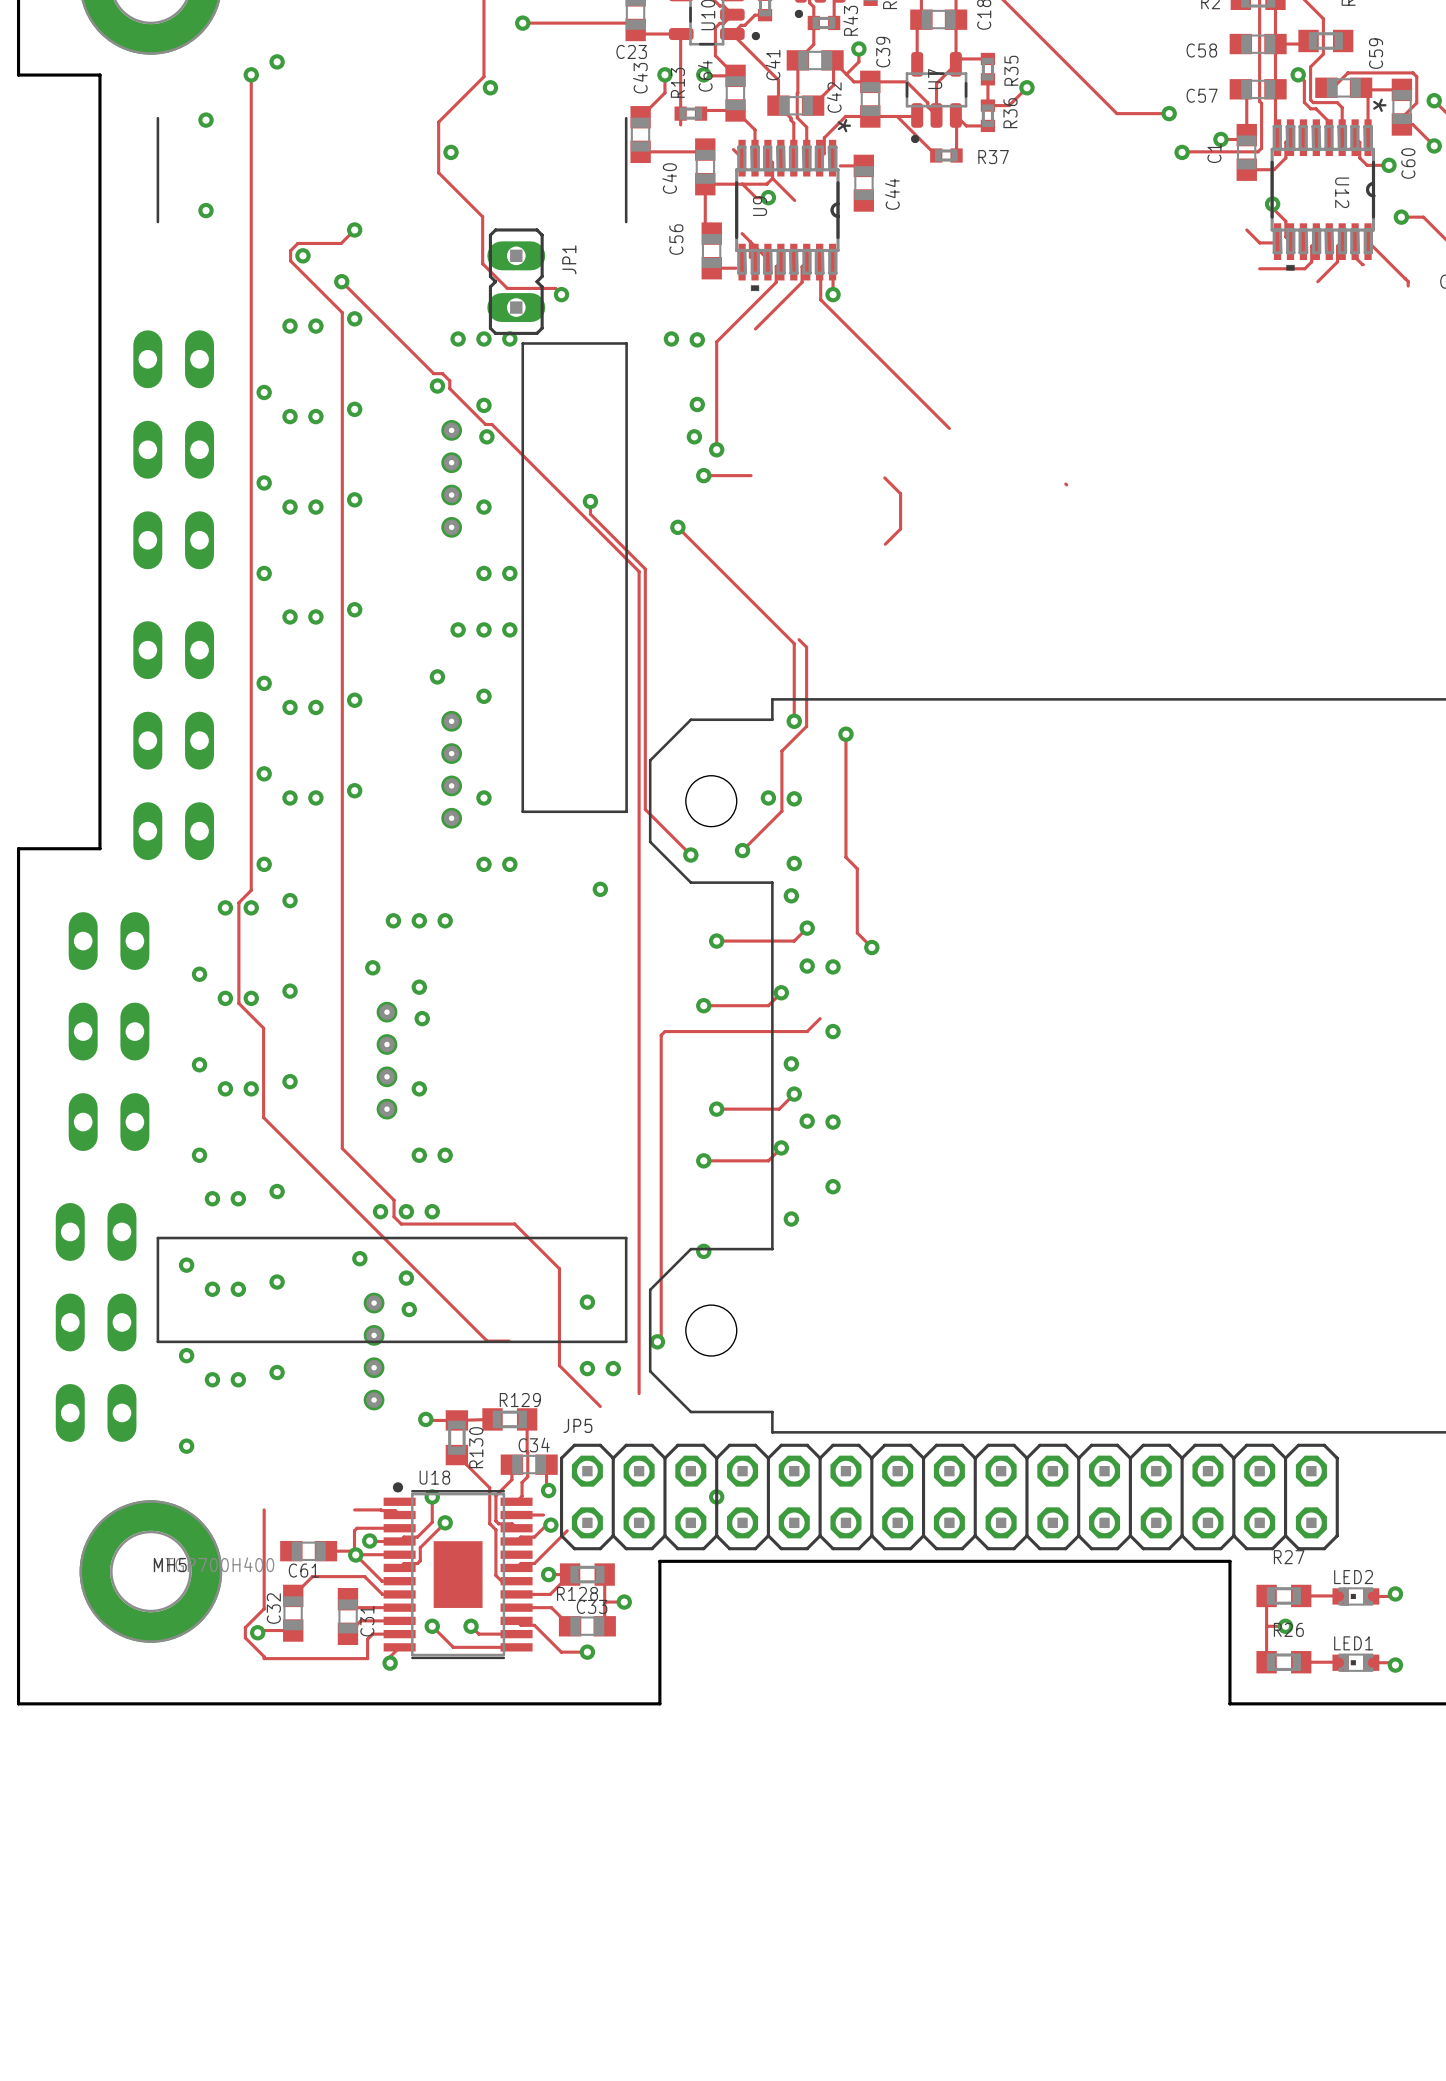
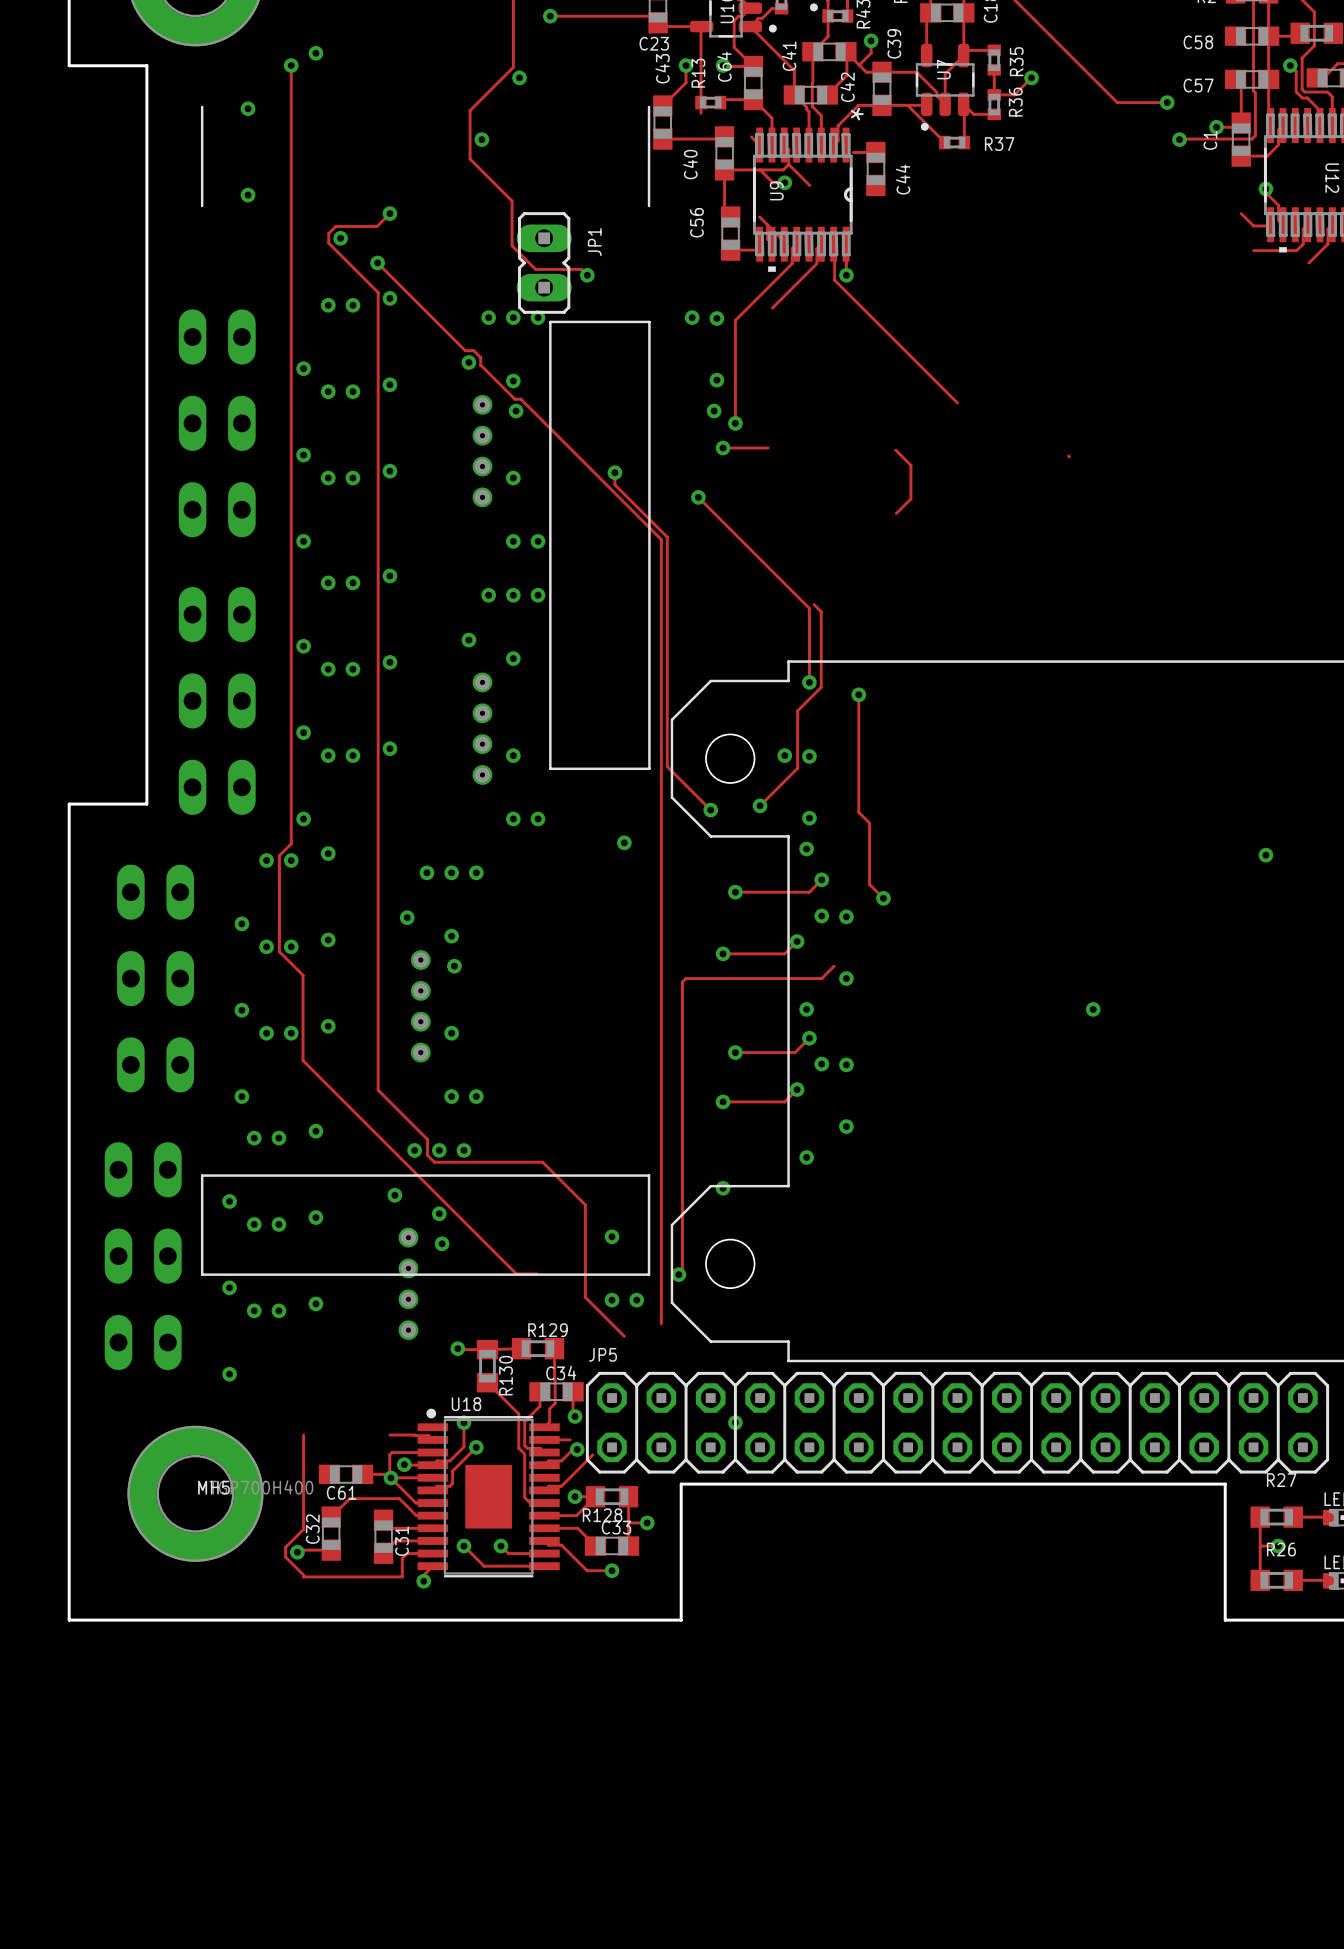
via: none -> (1265, 855)
via: none -> (1093, 1009)

